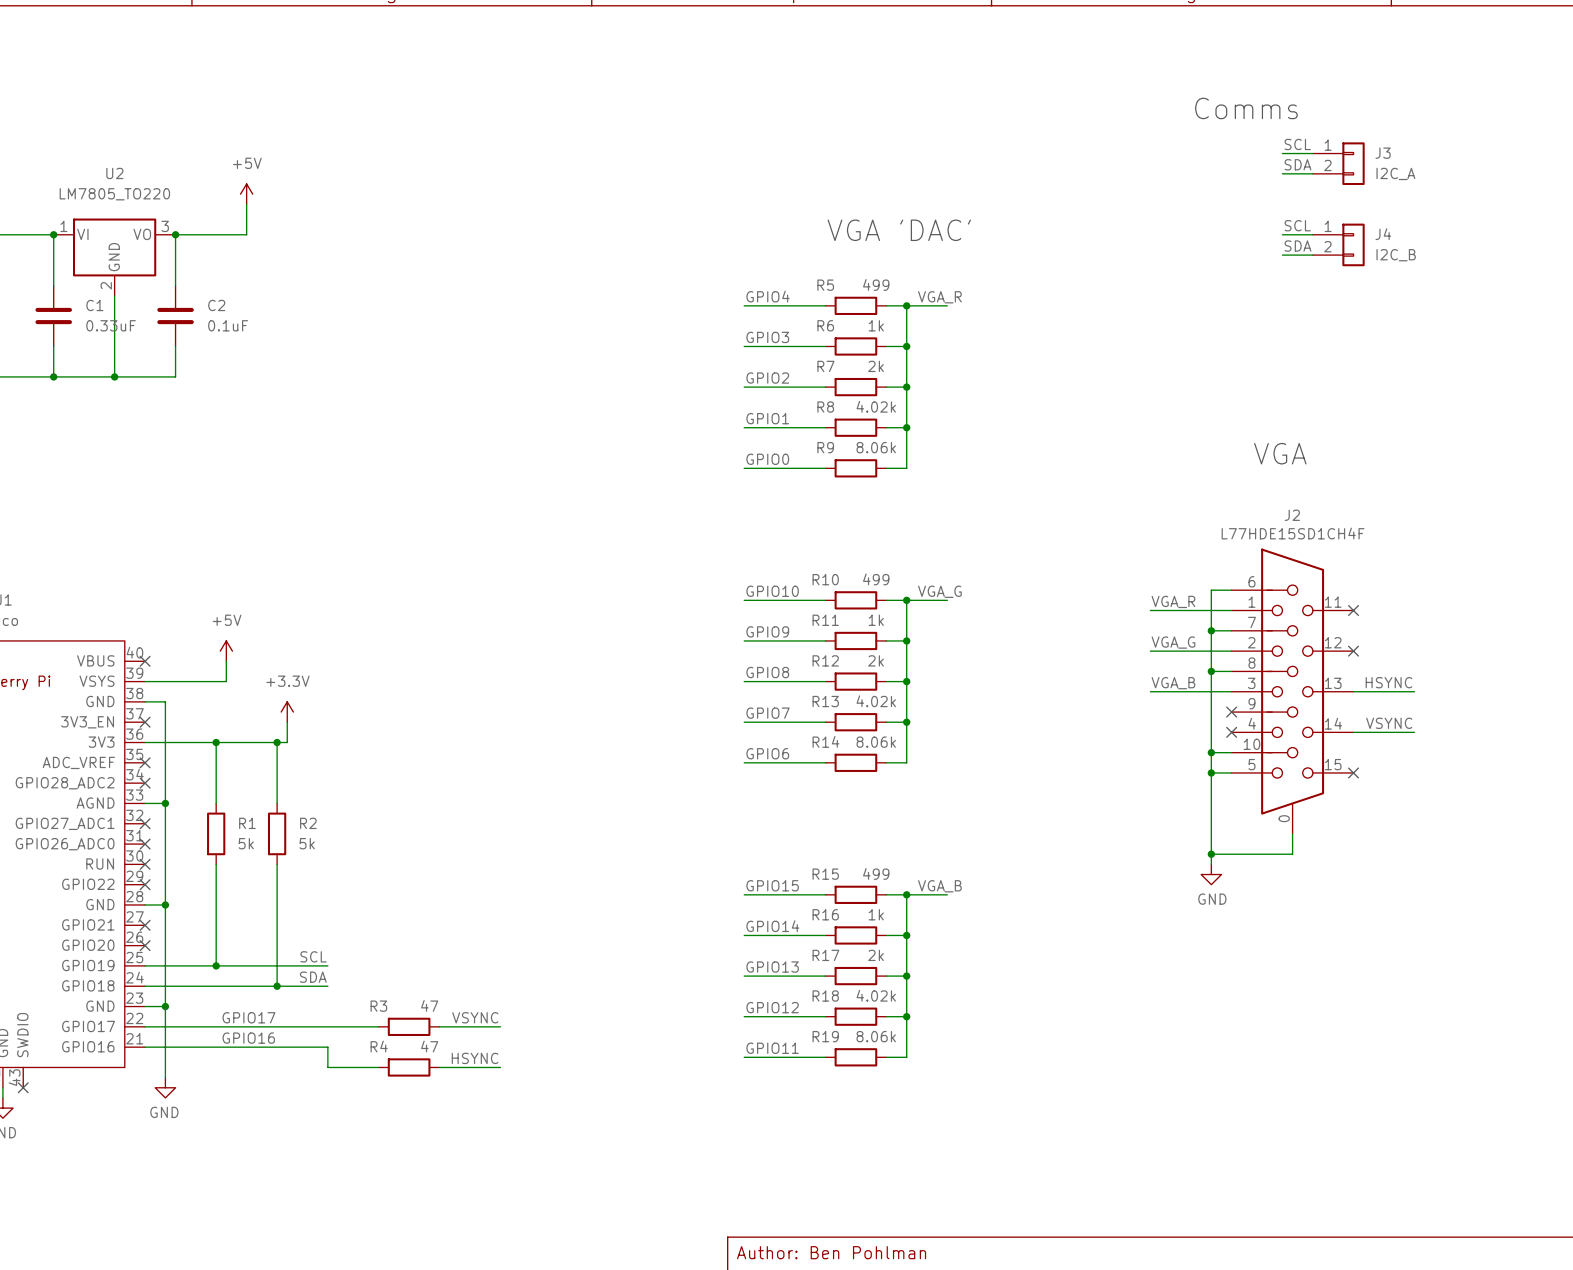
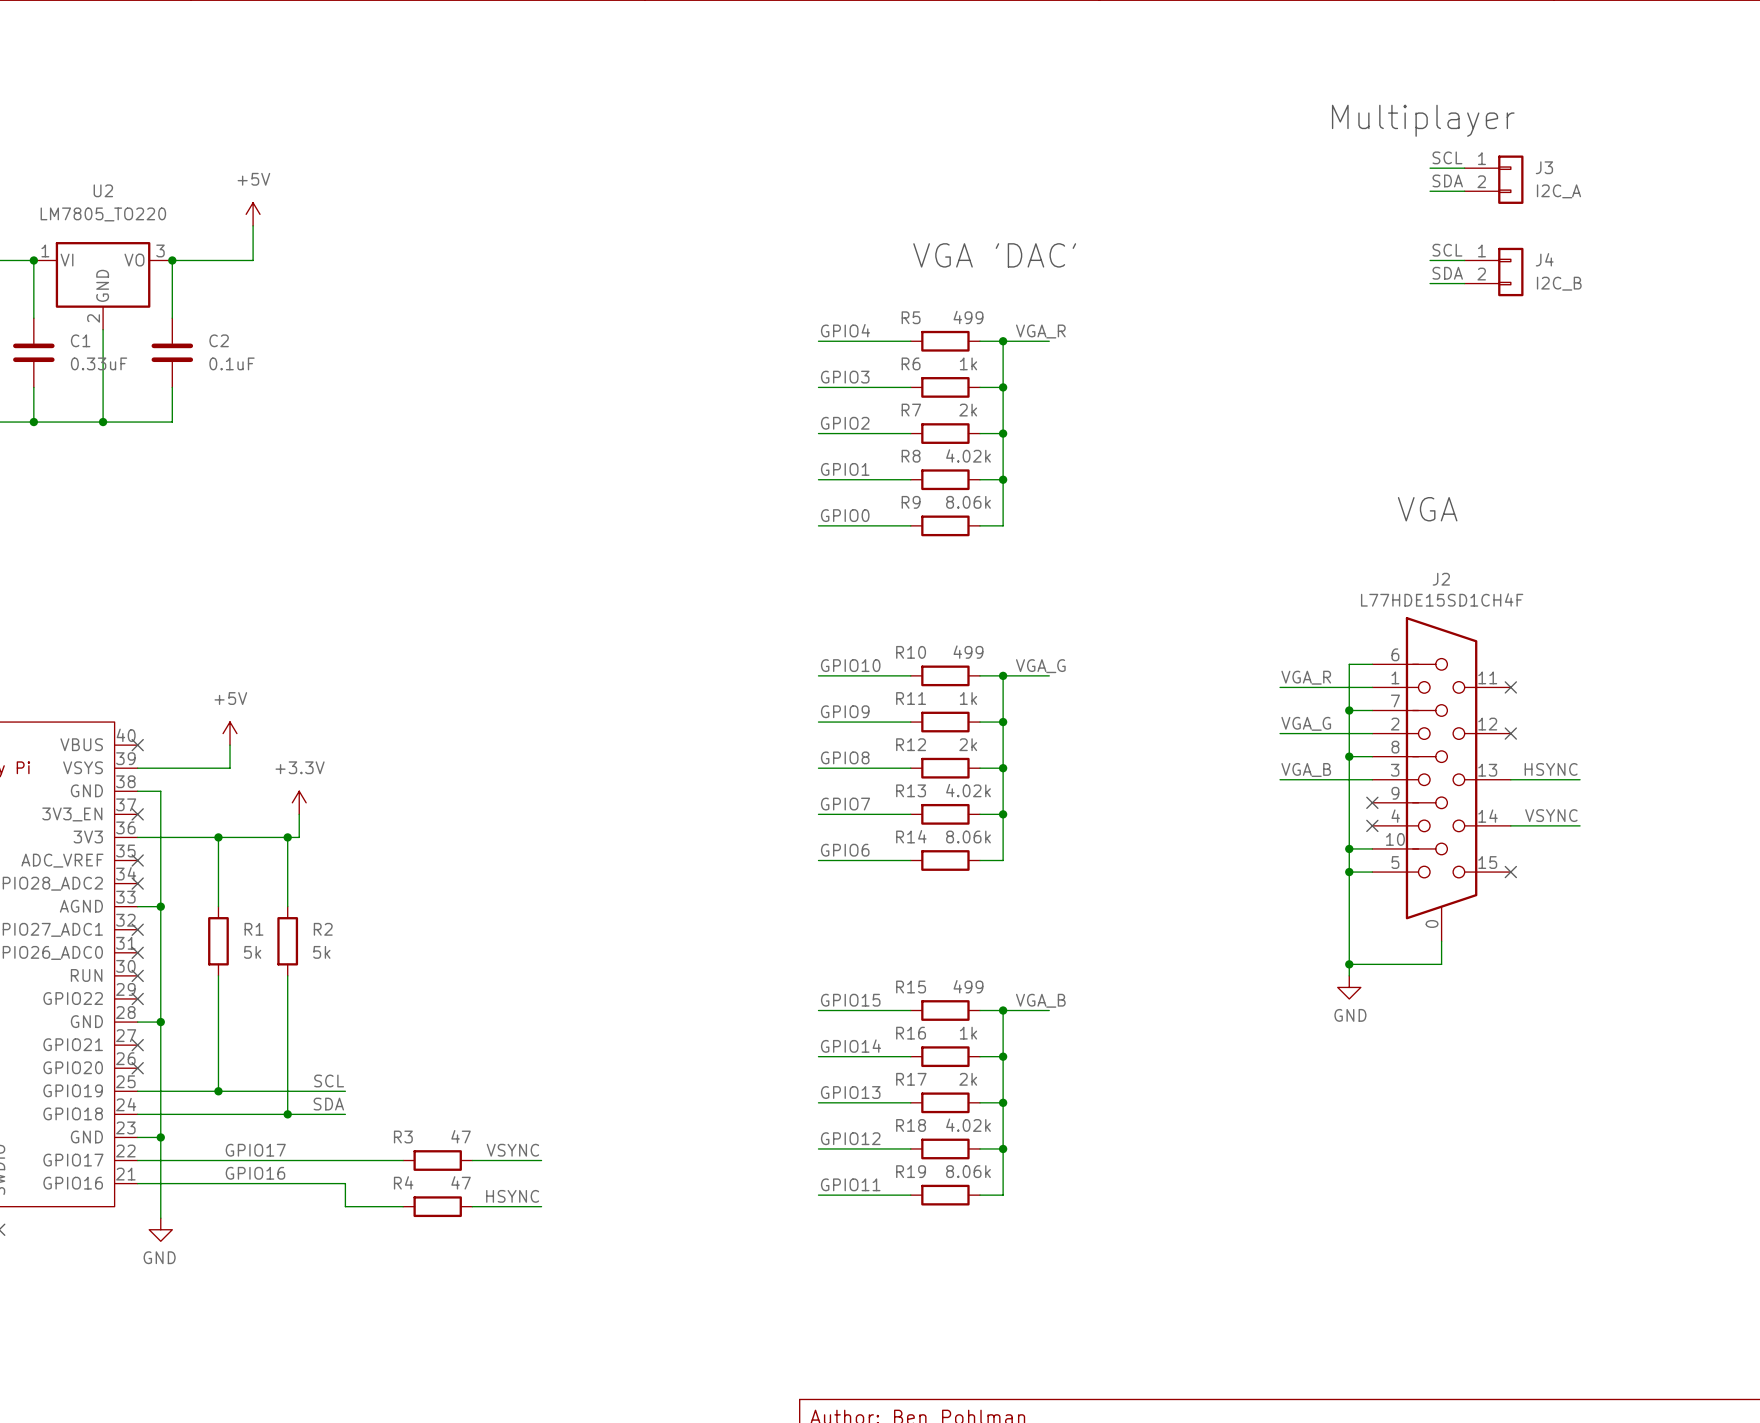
text: Comms (1246, 108) -> Multiplayer (1423, 120)

